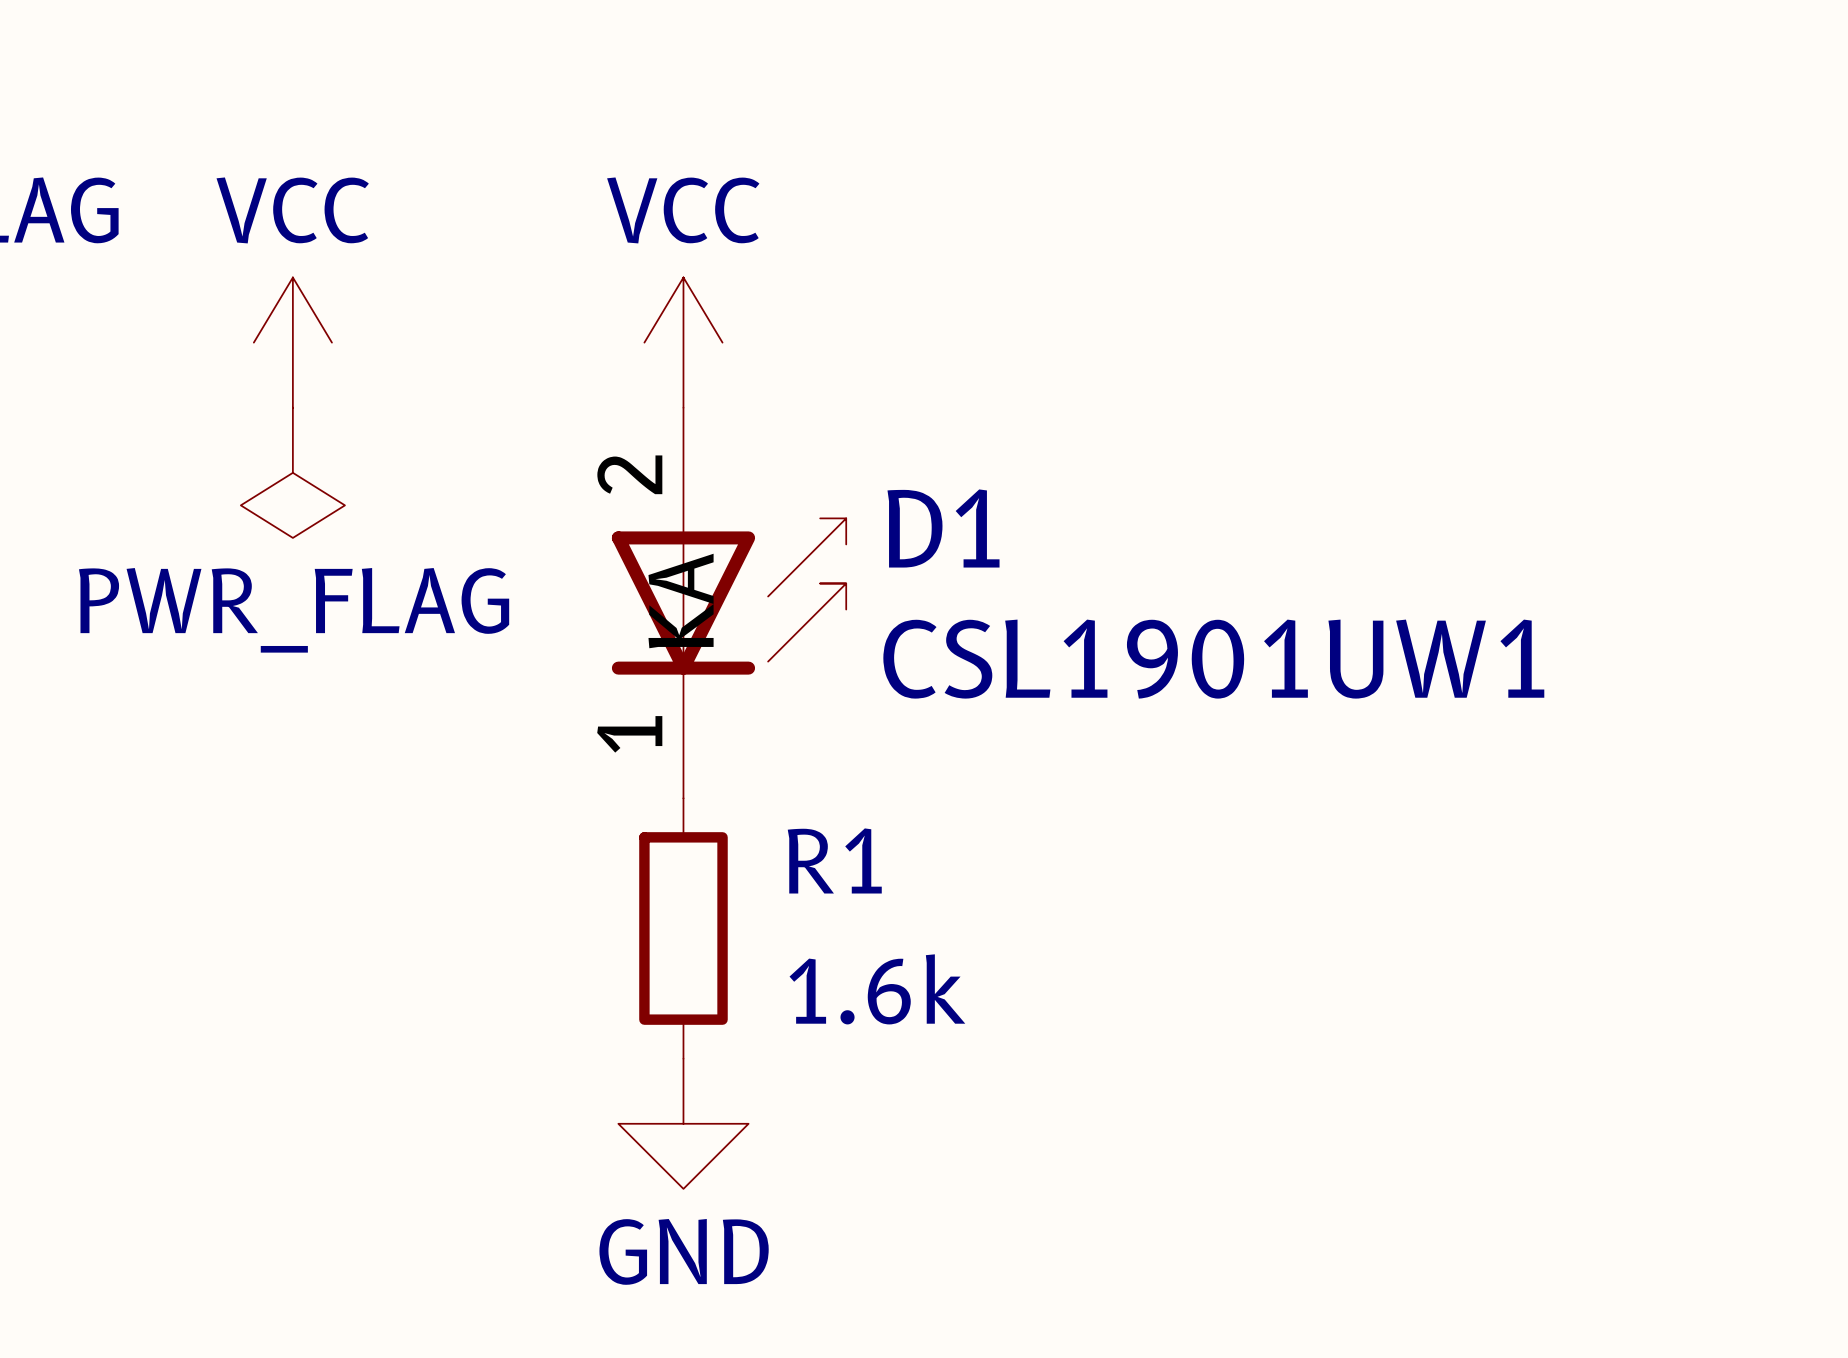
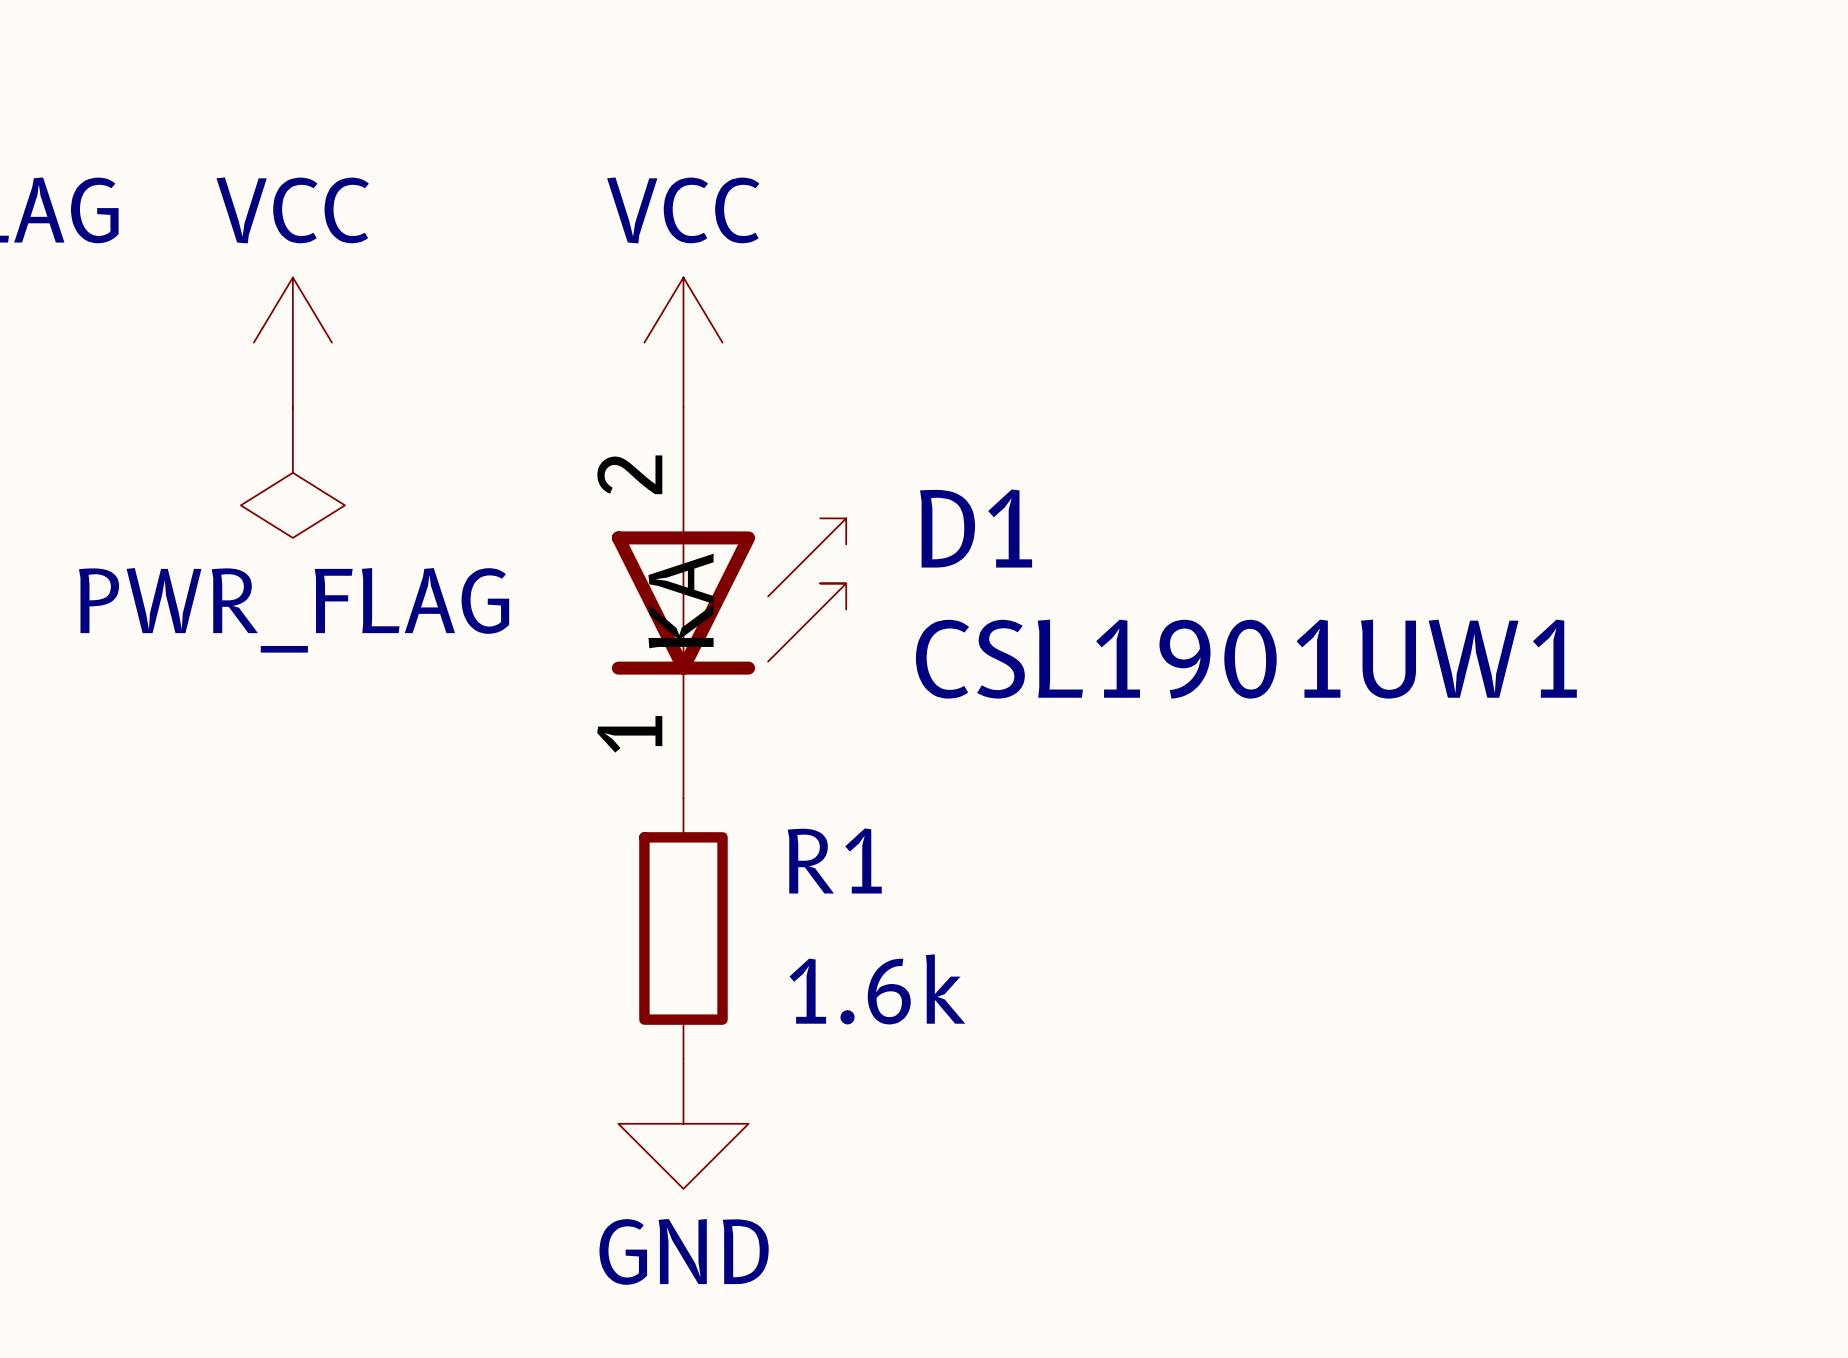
D1 name position: D1 (943, 528) -> D1 (976, 528)
D1 value position: CSL1901UW1 (1213, 659) -> CSL1901UW1 (1246, 659)

